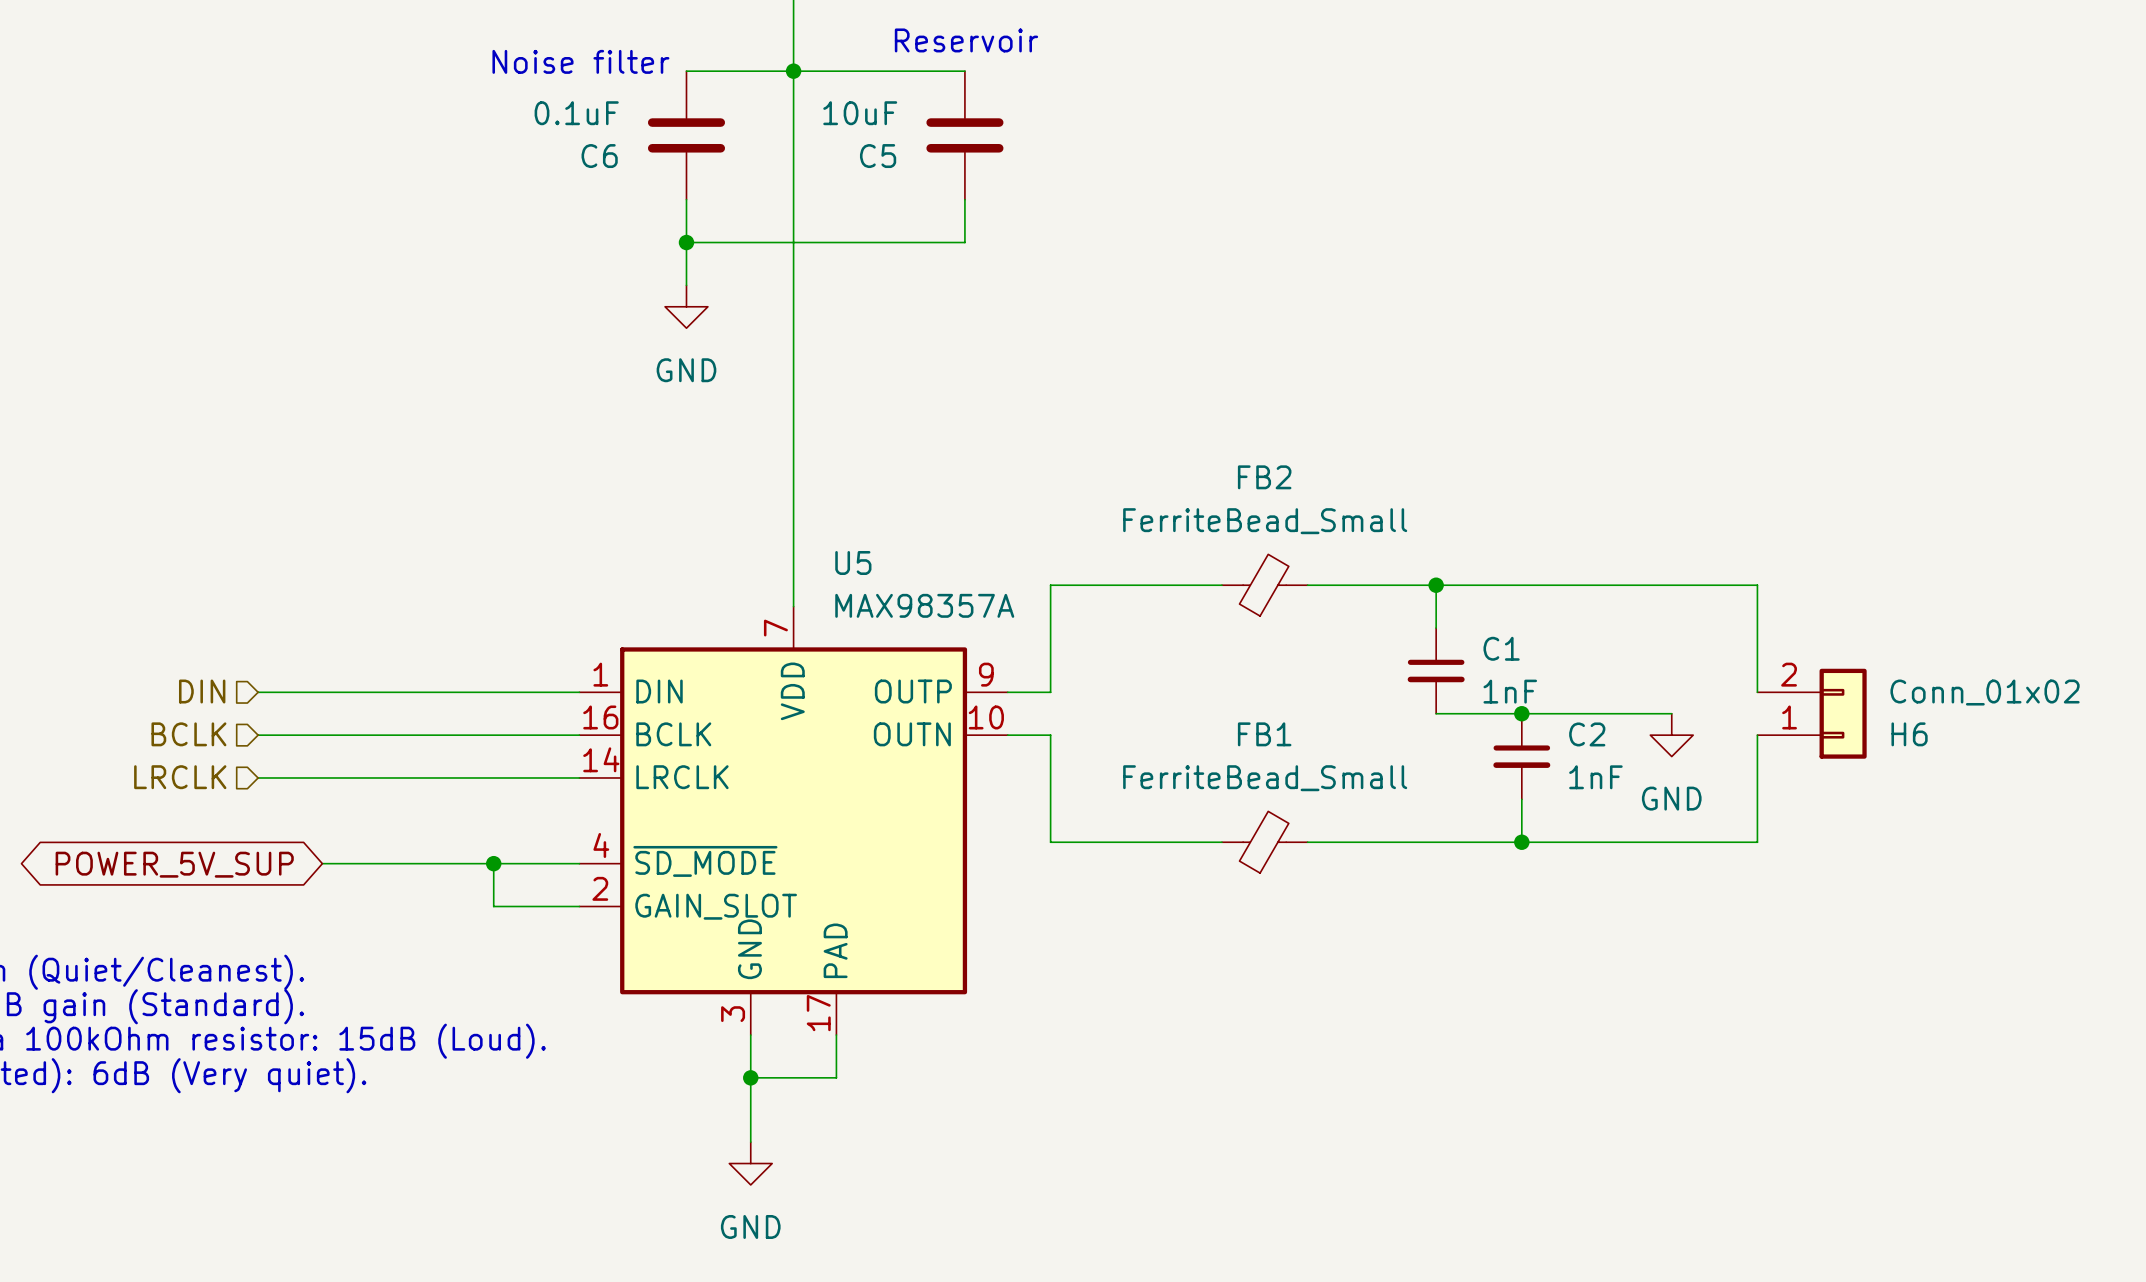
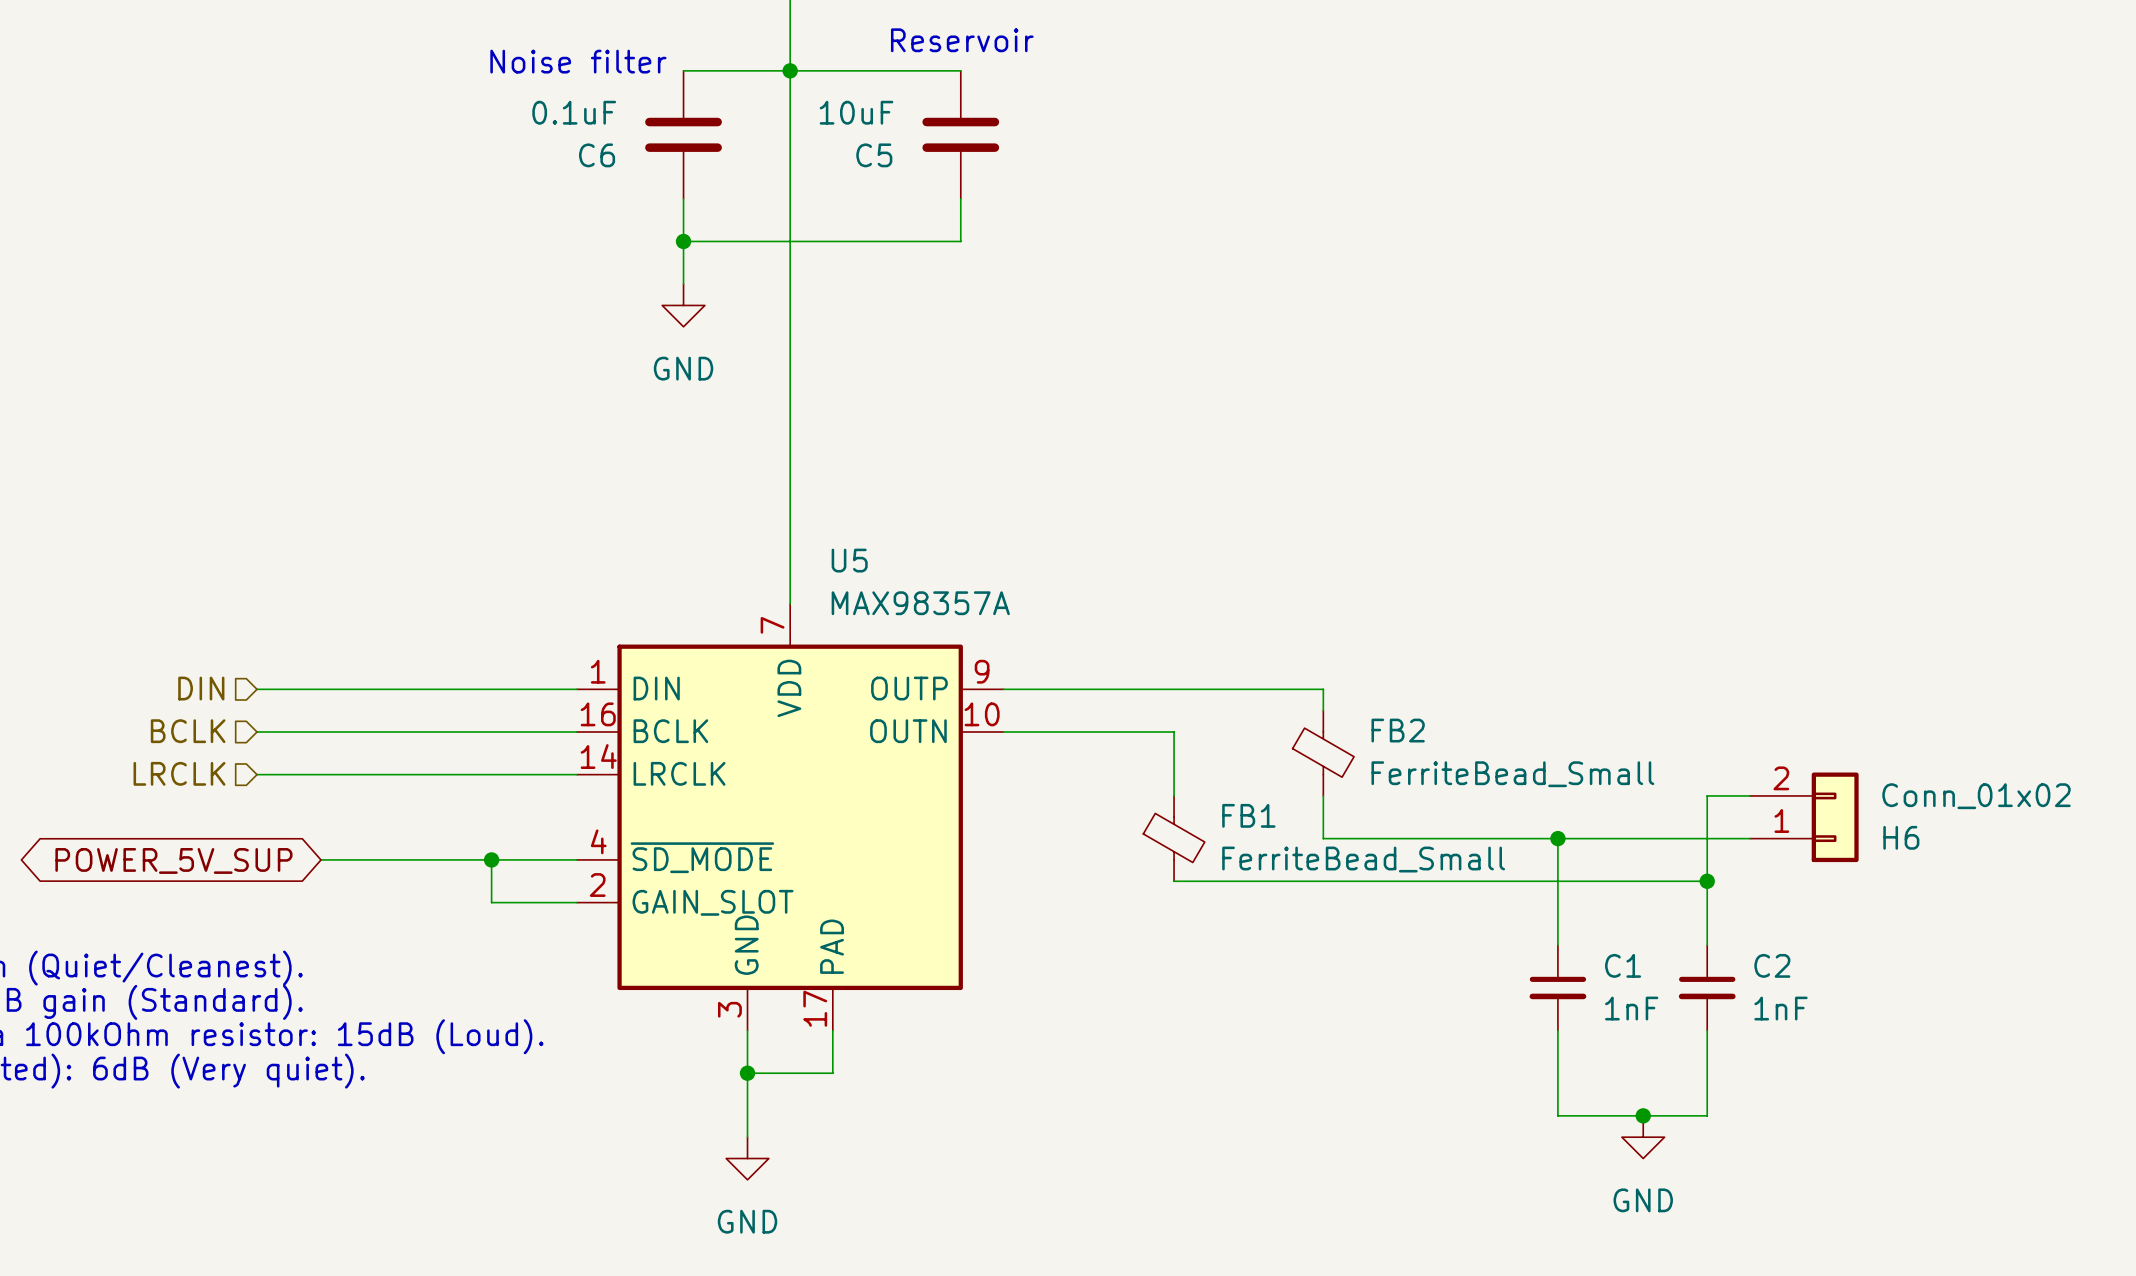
FB2 name position: FB2 (1264, 477) -> FB2 (1398, 730)
FB2 value position: FerriteBead_Small (1265, 521) -> FerriteBead_Small (1512, 774)
wire: (1221, 585) (1050, 585) (1050, 692) -> (1323, 710) (1323, 689) (1046, 689)
FB2 rotation: 0° (1264, 585) -> 90° clockwise (1323, 752)
FB2 position: (1264, 585) -> (1323, 753)
wire: (1307, 585) (1757, 585) (1757, 692) -> none
wire: (1436, 585) (1436, 628) -> none
junction: (1436, 585) -> none
C1 position: (1436, 670) -> (1557, 987)
wire: (1436, 713) (1671, 713) -> none
junction: (1521, 713) -> none
H6 position: (1812, 713) -> (1804, 817)
FB1 name position: FB1 (1264, 734) -> FB1 (1248, 815)
wire: (1050, 735) (1050, 842) (1221, 842) -> (1046, 731) (1174, 731) (1174, 795)
power symbol position: GND (1671, 735) -> GND (1643, 1137)
wire: (1757, 735) (1757, 842) -> (1557, 838) (1557, 945)
C2 position: (1521, 756) -> (1707, 987)
FB1 value position: FerriteBead_Small (1265, 778) -> FerriteBead_Small (1363, 859)
wire: (1521, 799) (1521, 842) -> none
wire: none -> (1749, 795) (1707, 795) (1707, 945)
FB1 rotation: 0° (1264, 842) -> 90° clockwise (1174, 837)
FB1 position: (1264, 842) -> (1174, 838)
wire: (1307, 842) (1329, 842) -> (1323, 795) (1323, 838)
junction position: (1521, 842) -> (1557, 838)
wire: none -> (1174, 881) (1707, 881)
junction: none -> (1707, 881)
wire: none -> (1557, 1030) (1557, 1115) (1707, 1115) (1707, 1030)
junction: none -> (1643, 1115)

